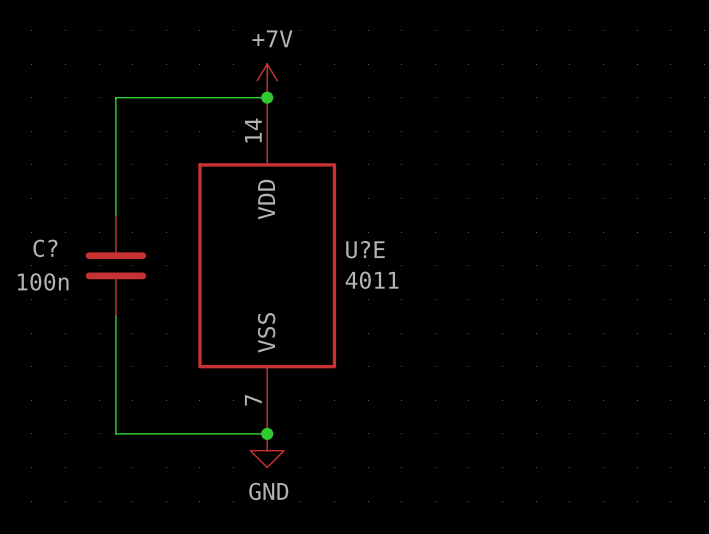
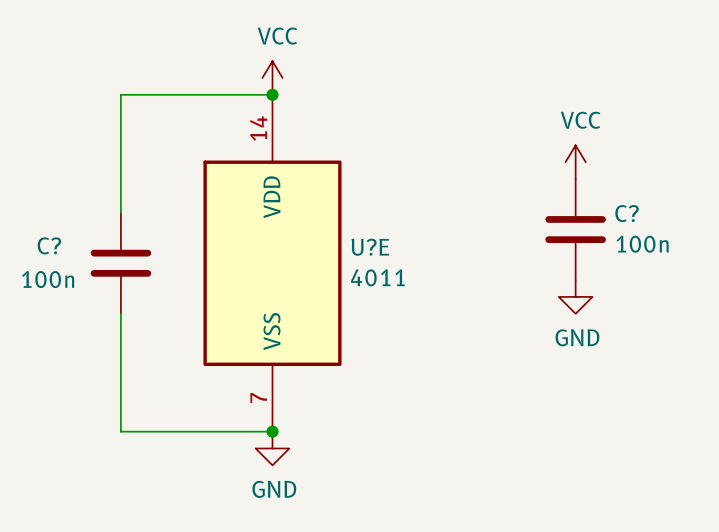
power symbol: +7V (267, 80) -> VCC (272, 78)
power symbol: none -> VCC (575, 162)
C?: none -> 100n (575, 229)
power symbol: none -> GND (575, 296)

